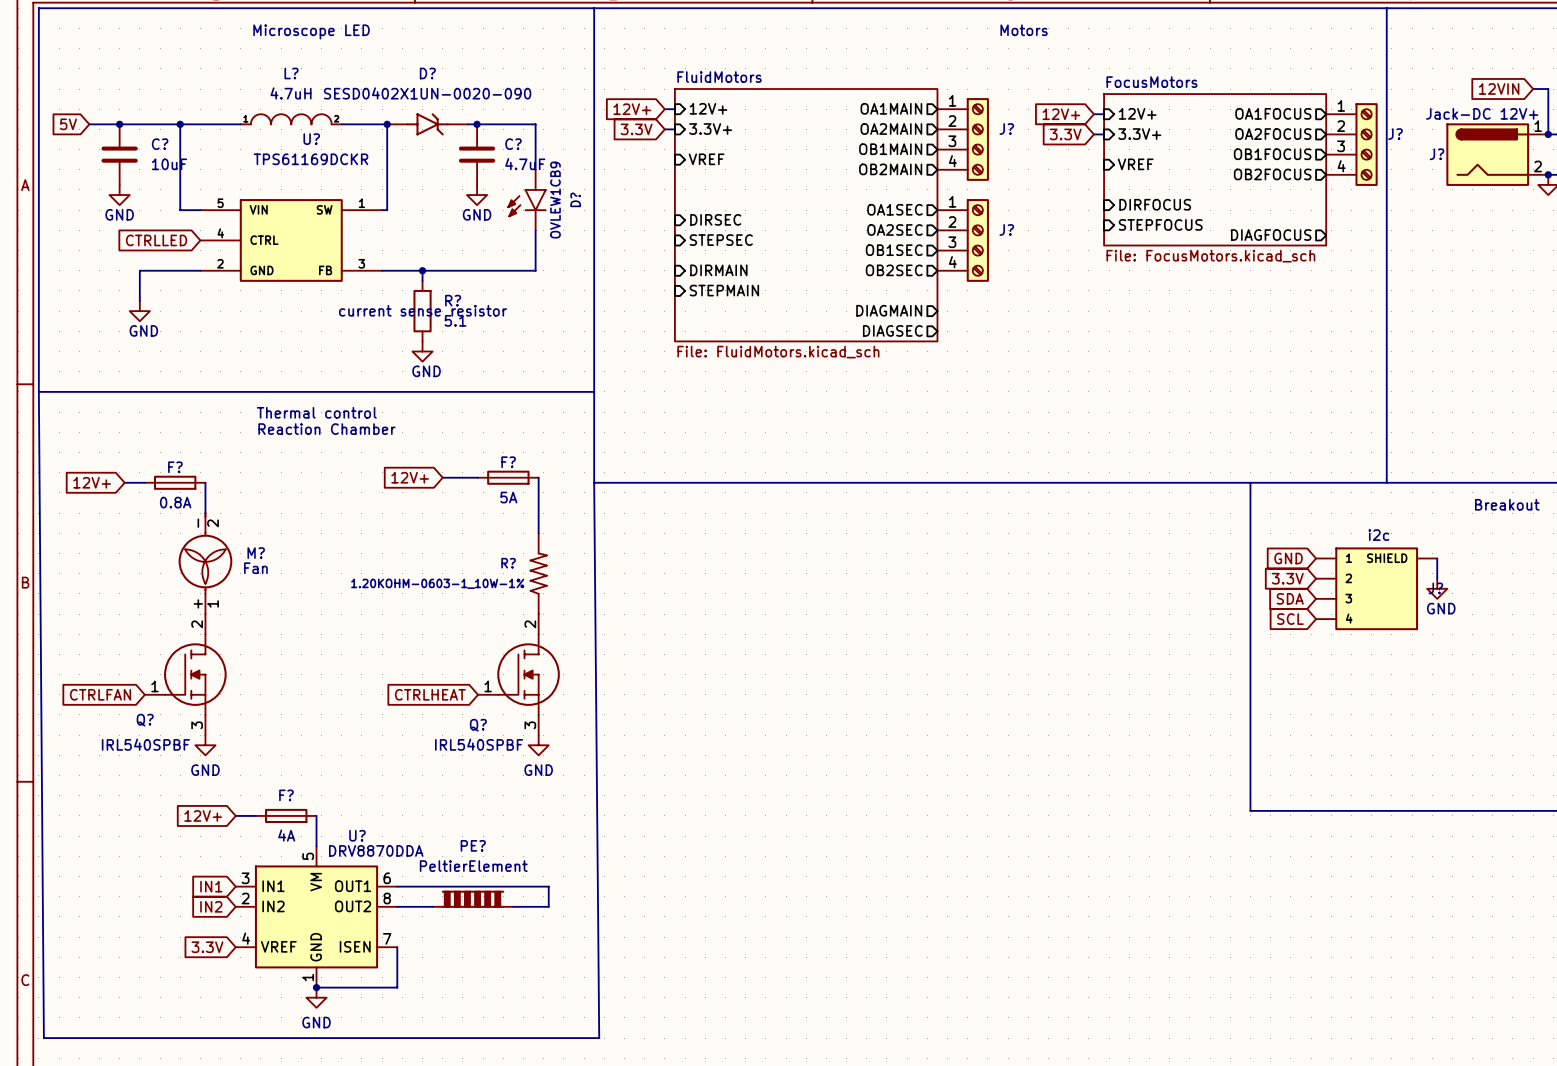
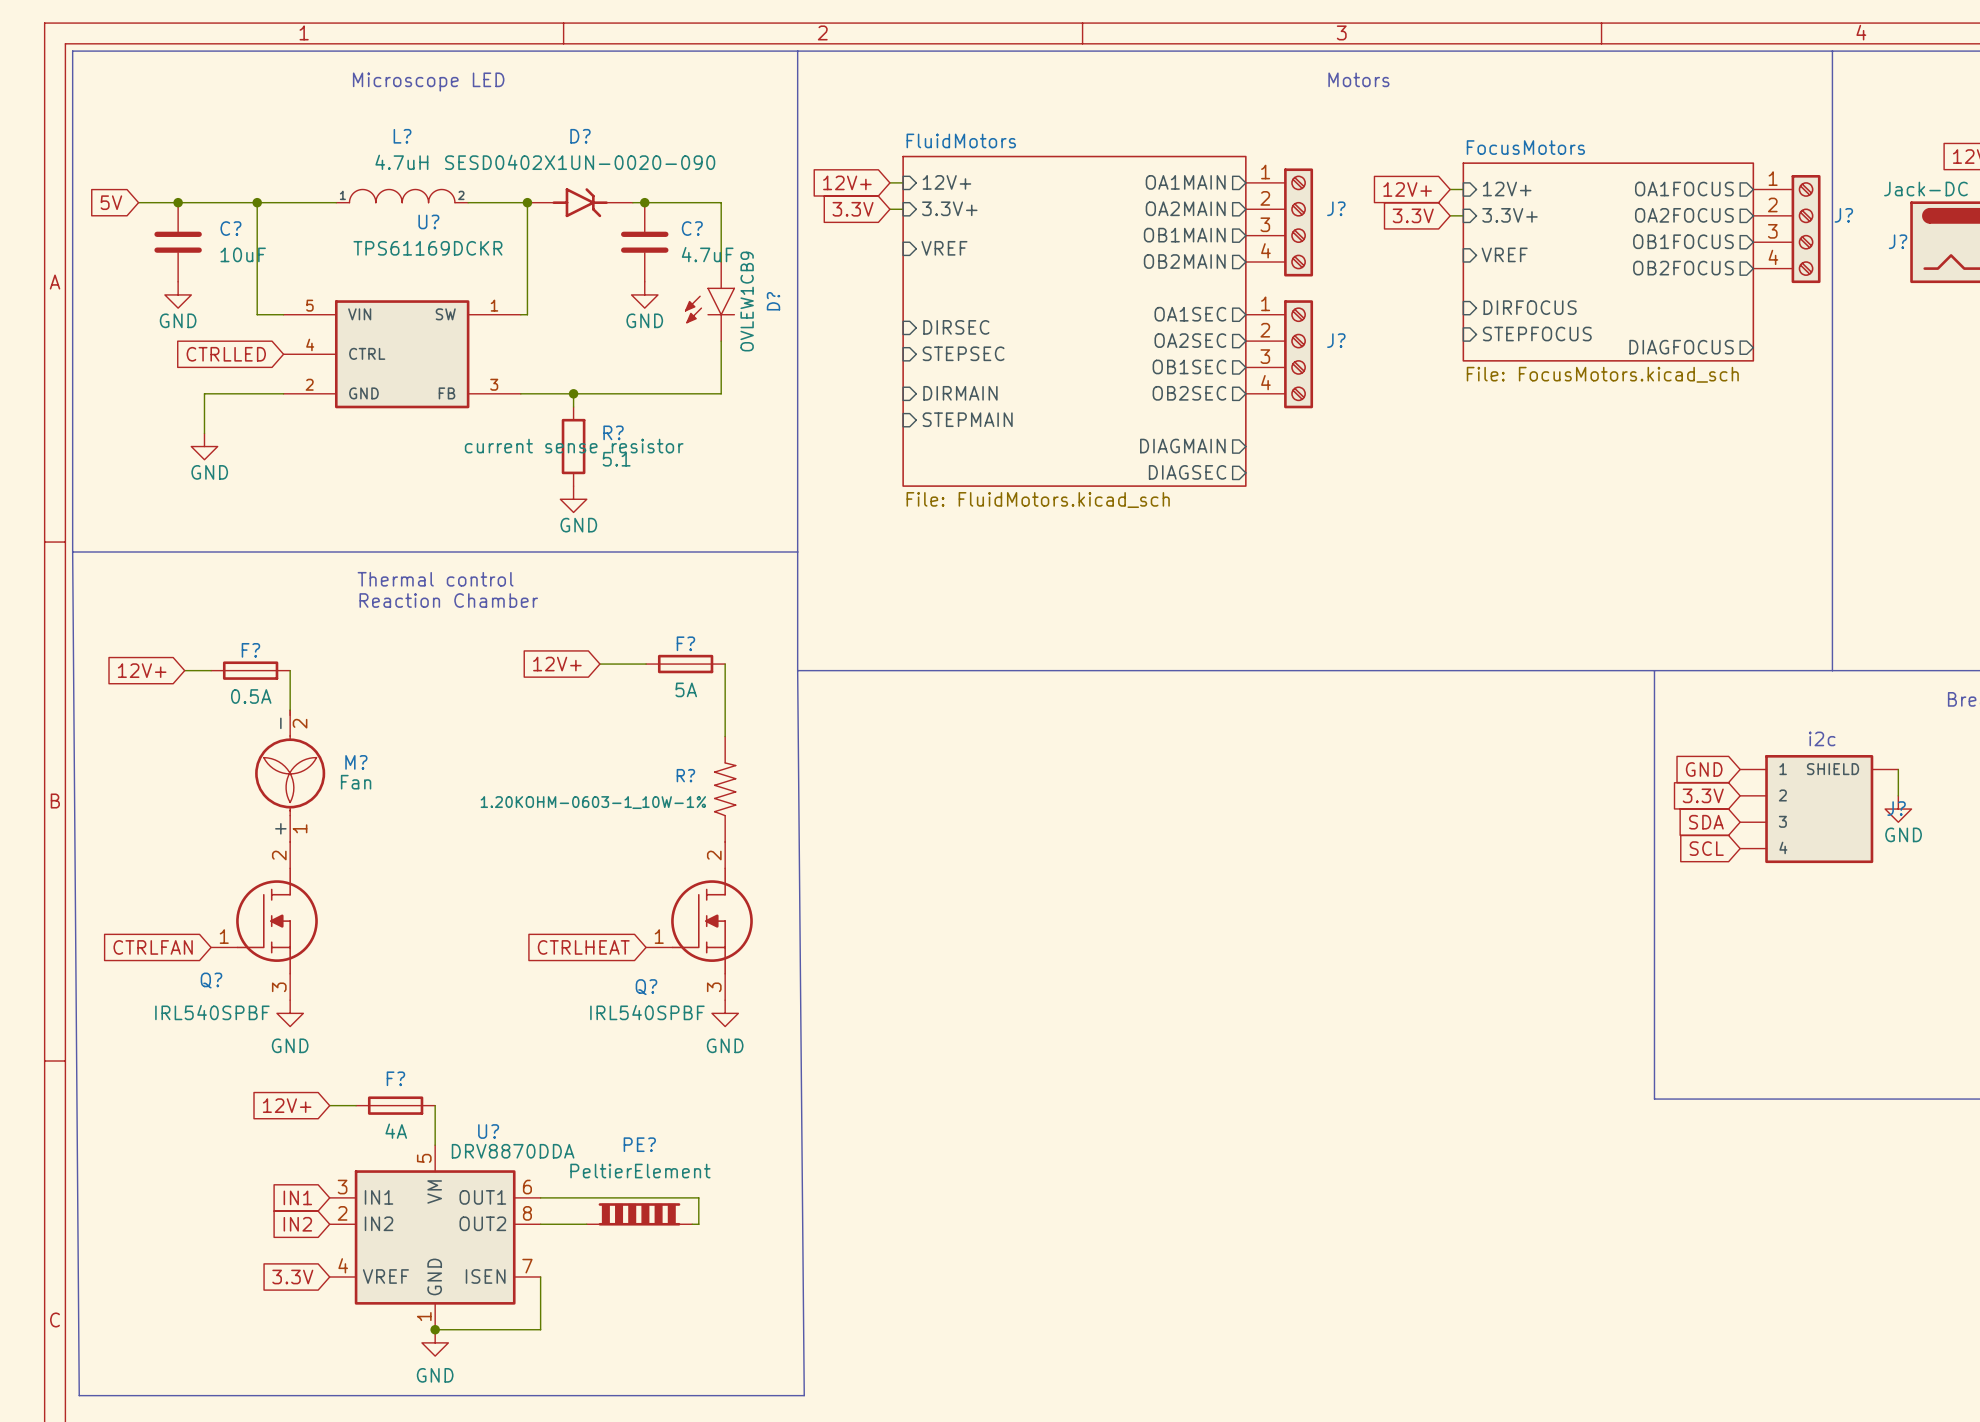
F? value: 0.8A (175, 502) -> 0.5A (251, 696)
wire: (518, 886) (548, 886) (548, 906) (518, 906) -> (698, 1197) (698, 1224)

